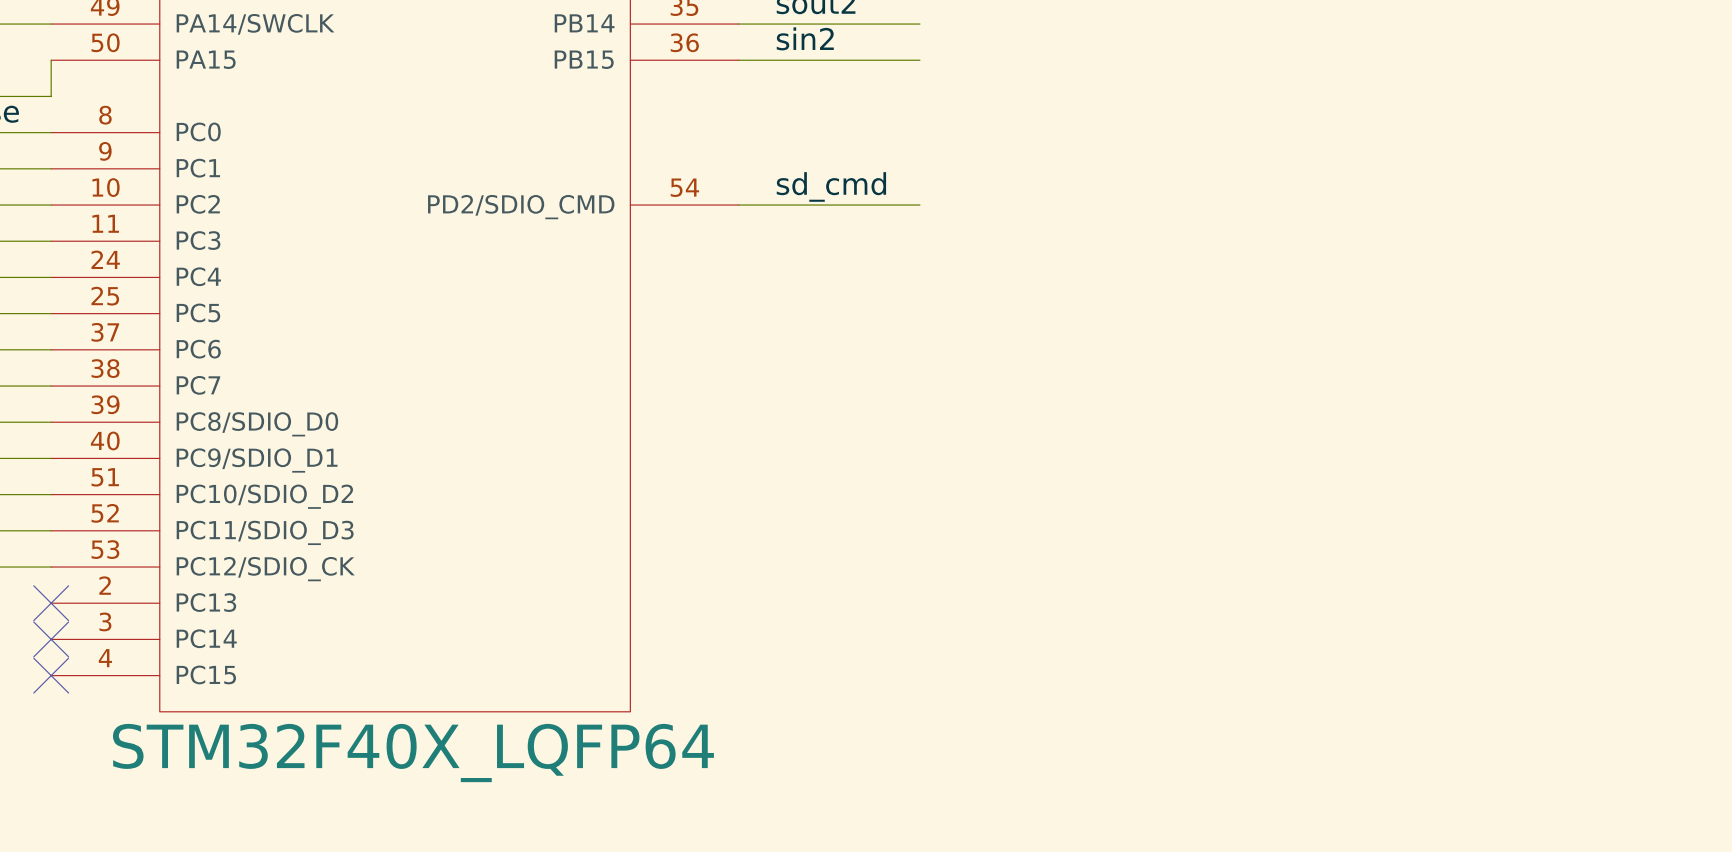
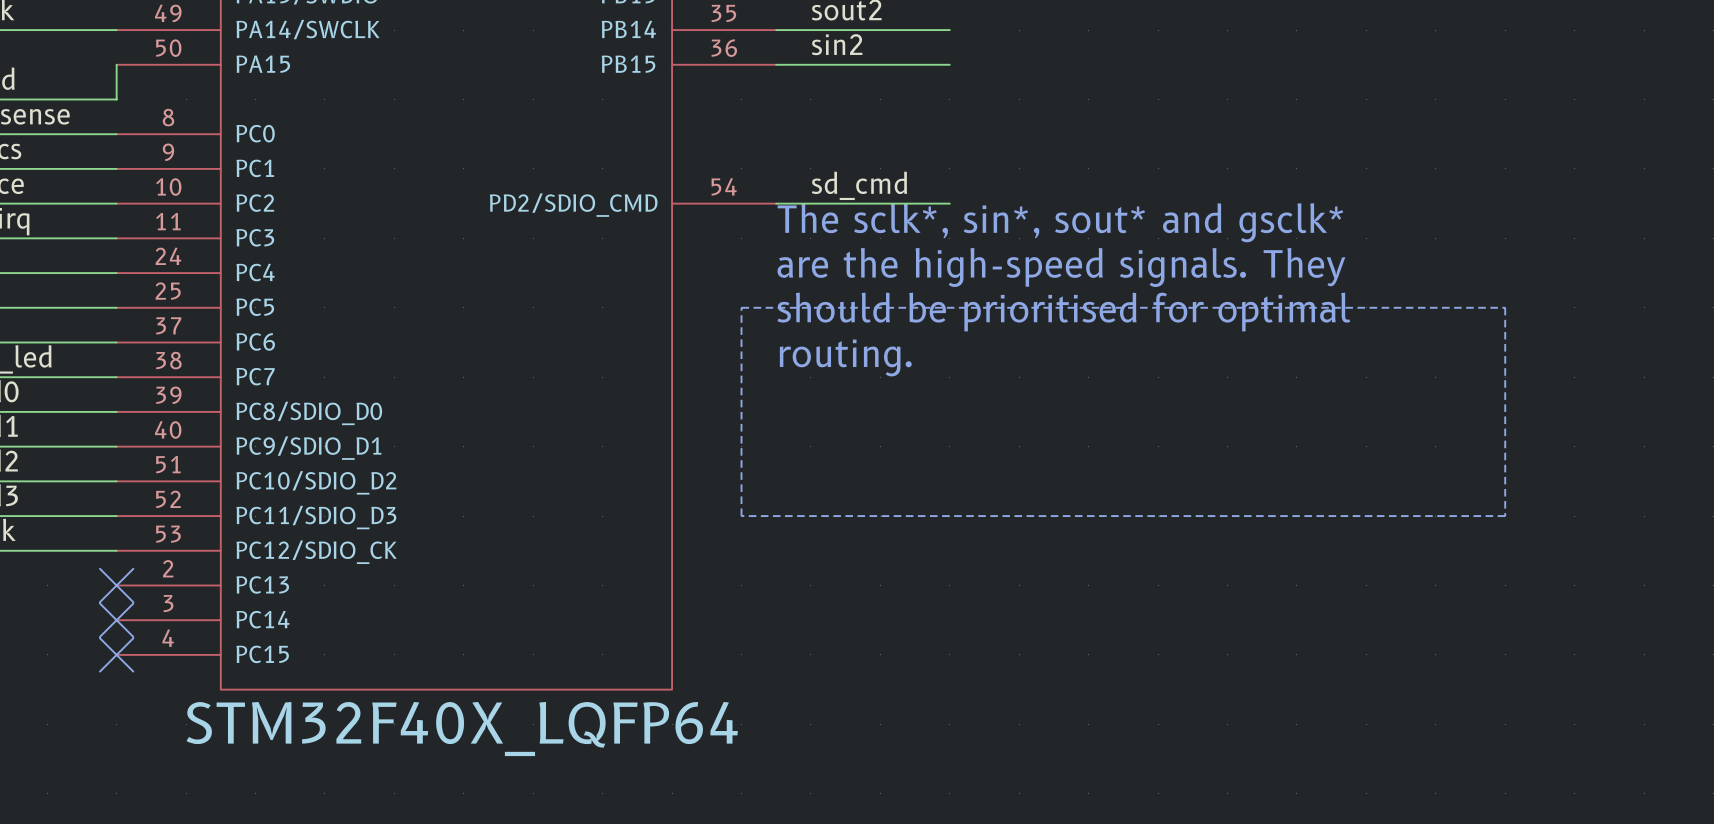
text: none -> The sclk*, sin*, sout* and gsclk* (1060, 222)
text: none -> are the high-speed signals. They (1061, 267)
line: none -> (741, 307) (1505, 307) (1505, 516) (741, 516) (741, 307)
text: none -> should be prioritised for optimal (1063, 312)
text: none -> routing. (845, 357)

